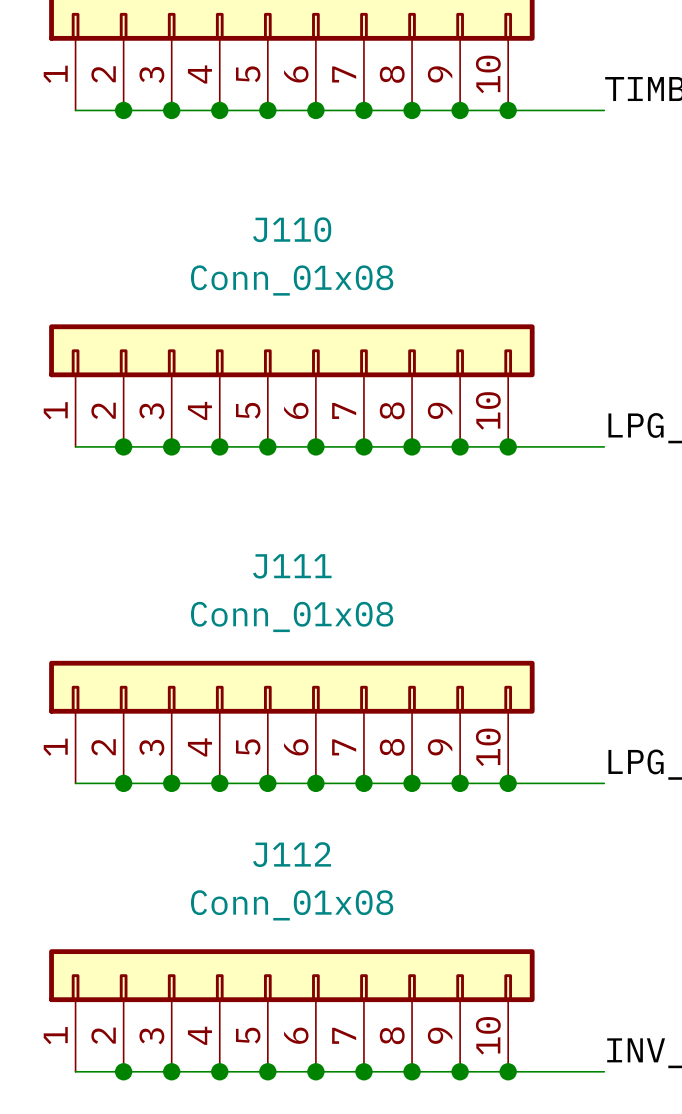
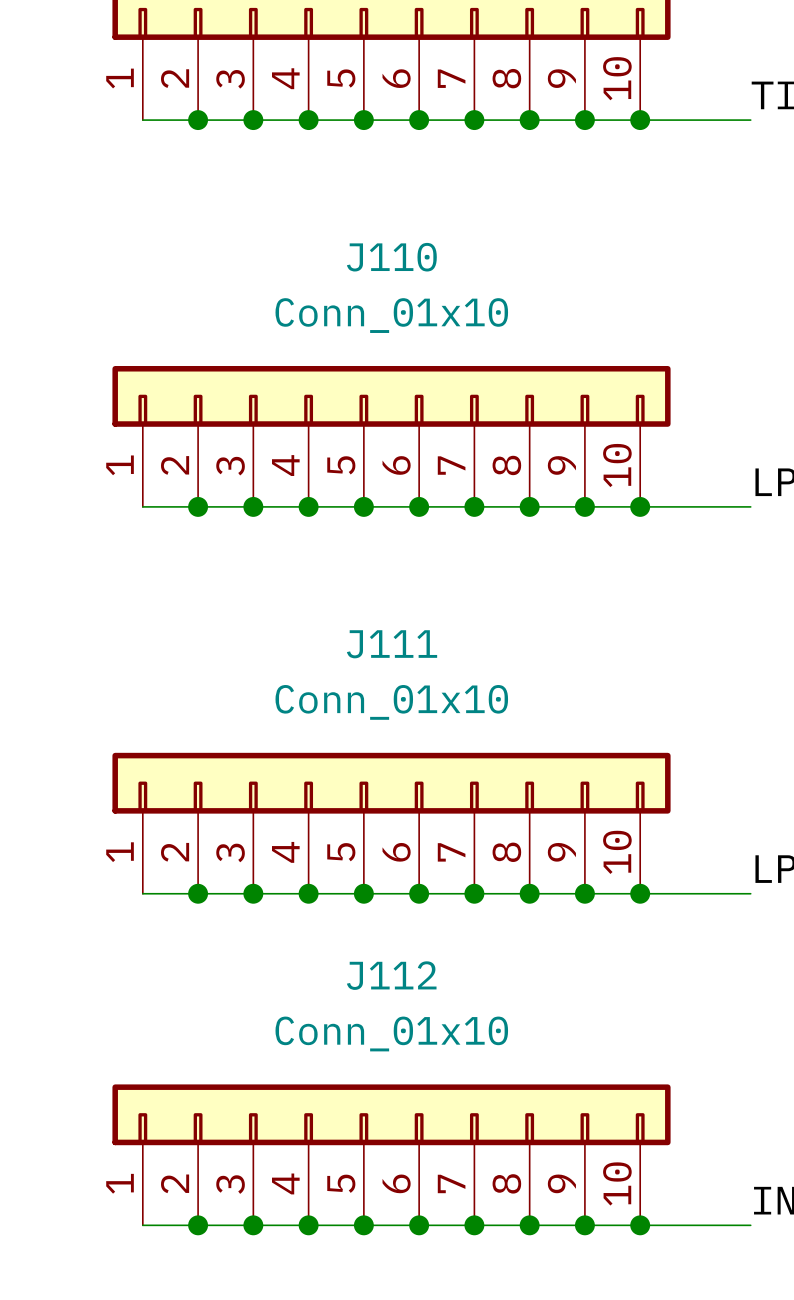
J110 value: Conn_01x08 (292, 280) -> Conn_01x10 (391, 315)
J111 value: Conn_01x08 (292, 616) -> Conn_01x10 (391, 702)
J112 value: Conn_01x08 (292, 905) -> Conn_01x10 (391, 1033)

